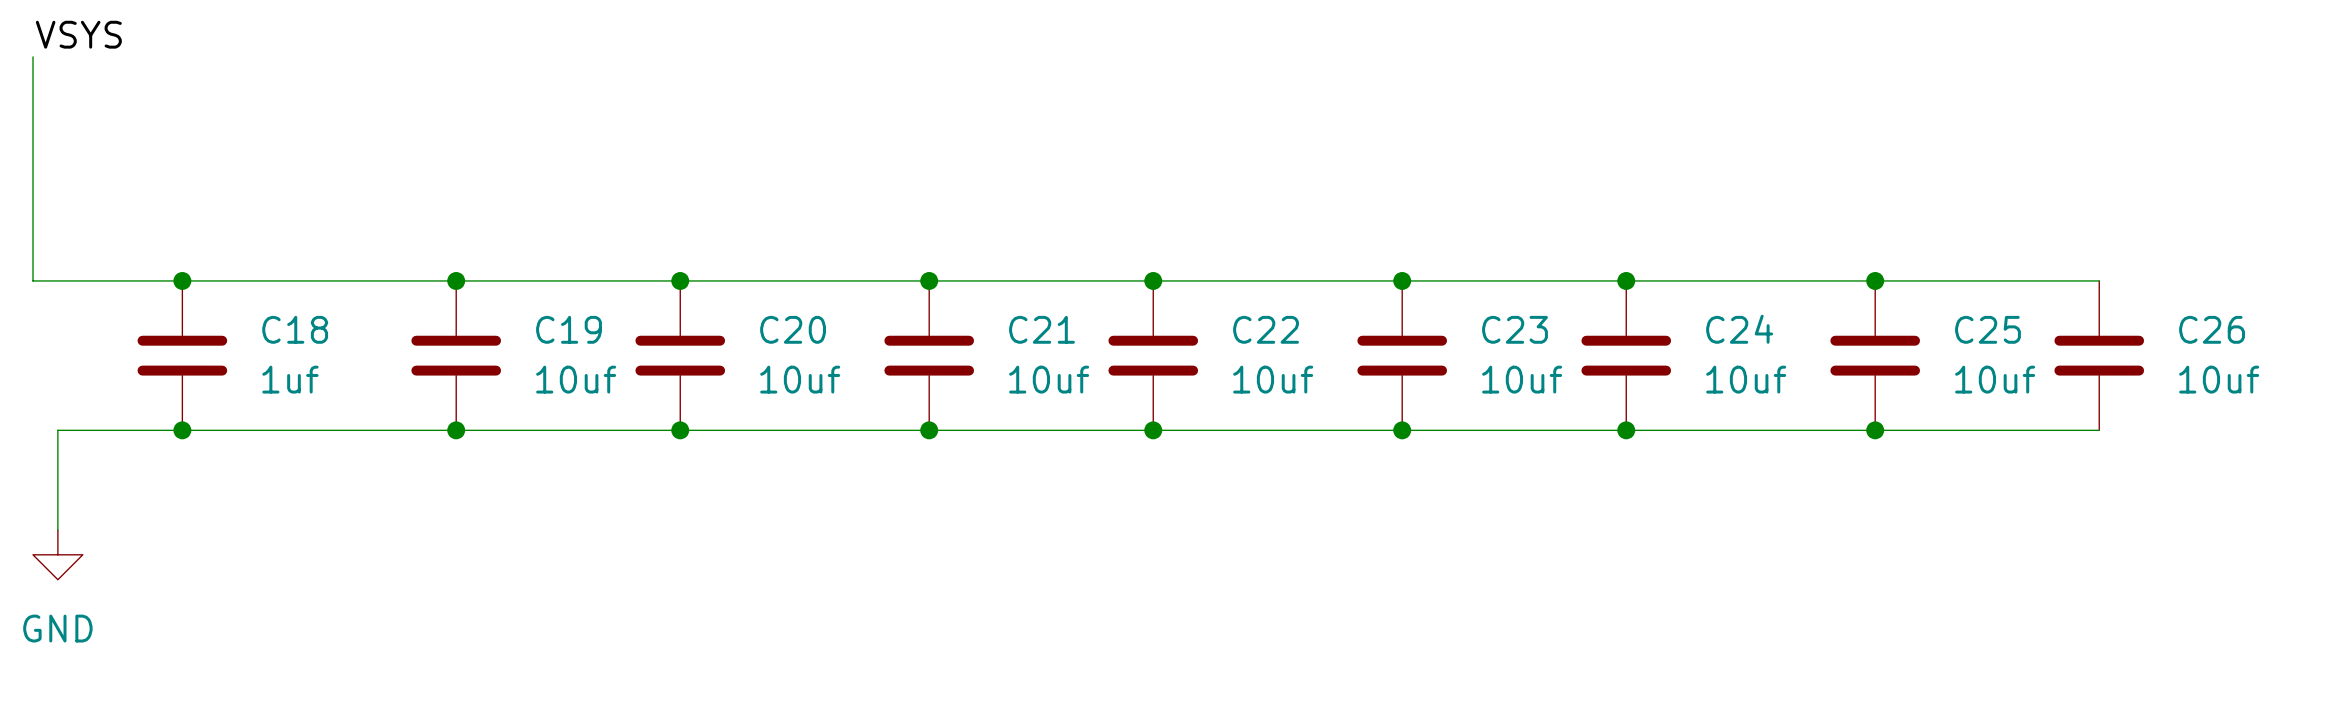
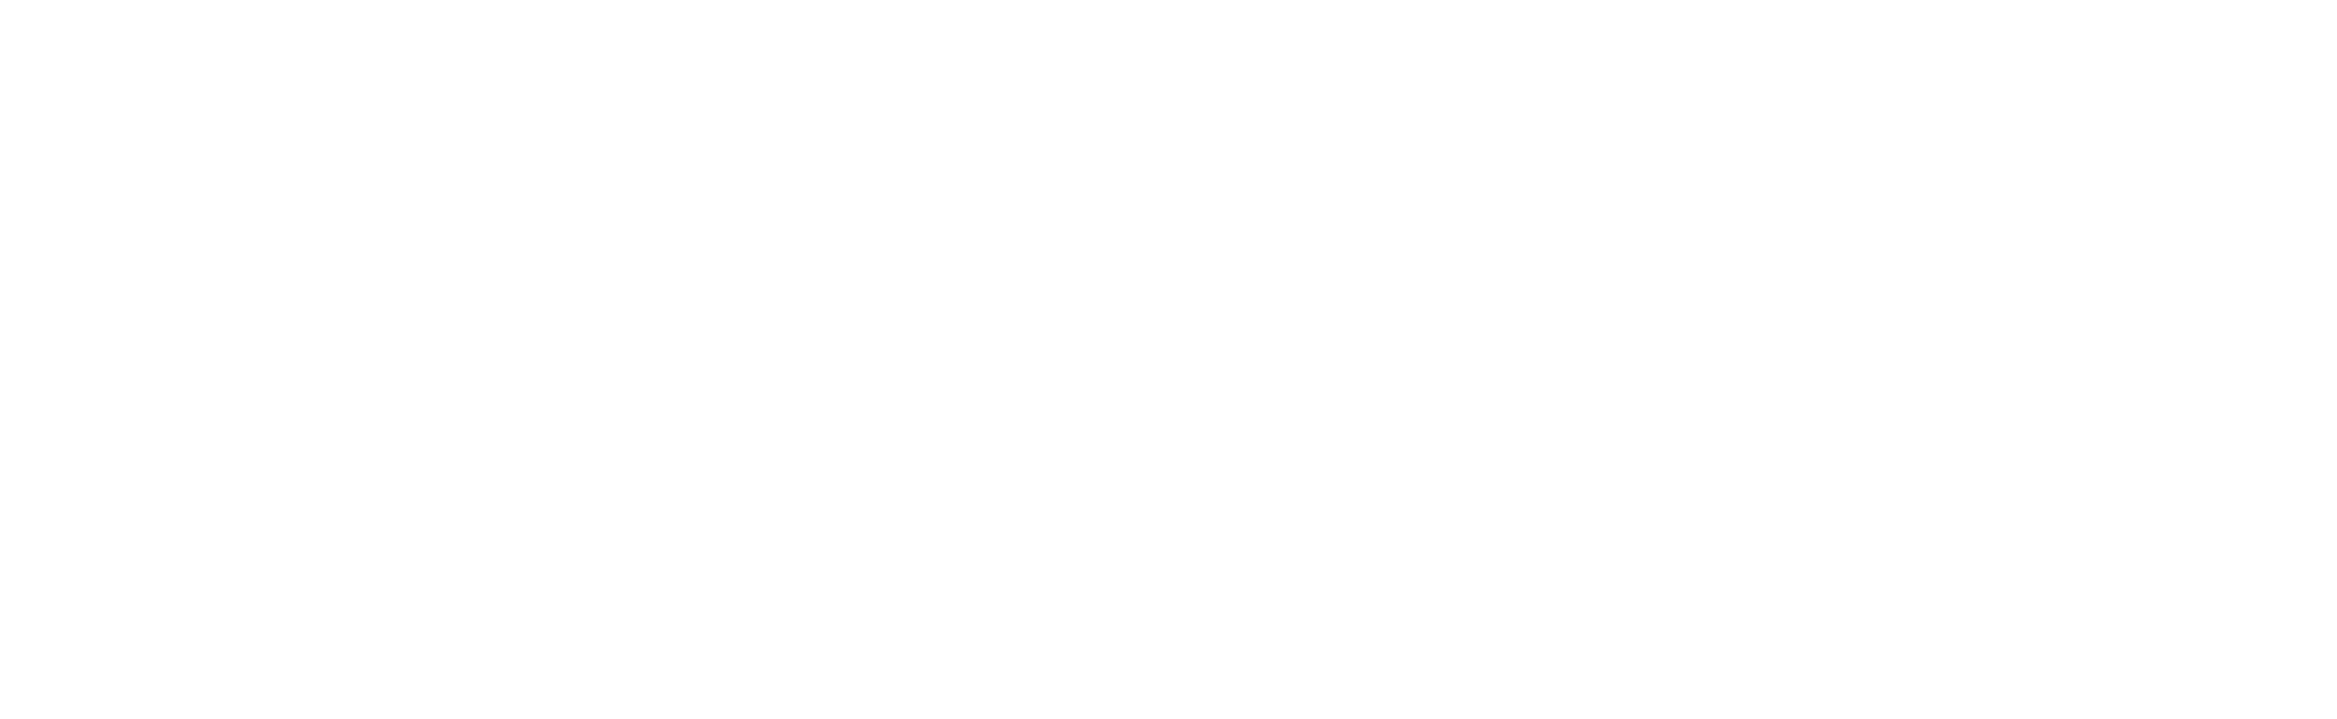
label: VSYS (78, 34) -> none
wire: (33, 56) (33, 280) (2099, 280) -> none
junction: (182, 280) -> none
junction: (456, 280) -> none
junction: (680, 280) -> none
junction: (929, 280) -> none
junction: (1153, 280) -> none
junction: (1402, 280) -> none
junction: (1626, 280) -> none
junction: (1875, 280) -> none
C18: 1uf (182, 355) -> none
C19: 10uf (456, 355) -> none
C20: 10uf (680, 355) -> none
C21: 10uf (929, 355) -> none
C22: 10uf (1153, 355) -> none
C23: 10uf (1402, 355) -> none
C24: 10uf (1626, 355) -> none
C25: 10uf (1875, 355) -> none
C26: 10uf (2099, 355) -> none
junction: (182, 430) -> none
junction: (456, 430) -> none
junction: (680, 430) -> none
junction: (929, 430) -> none
junction: (1153, 430) -> none
junction: (1402, 430) -> none
junction: (1626, 430) -> none
junction: (1875, 430) -> none
wire: (2099, 430) (57, 430) (57, 529) -> none
power symbol: GND (57, 554) -> none

